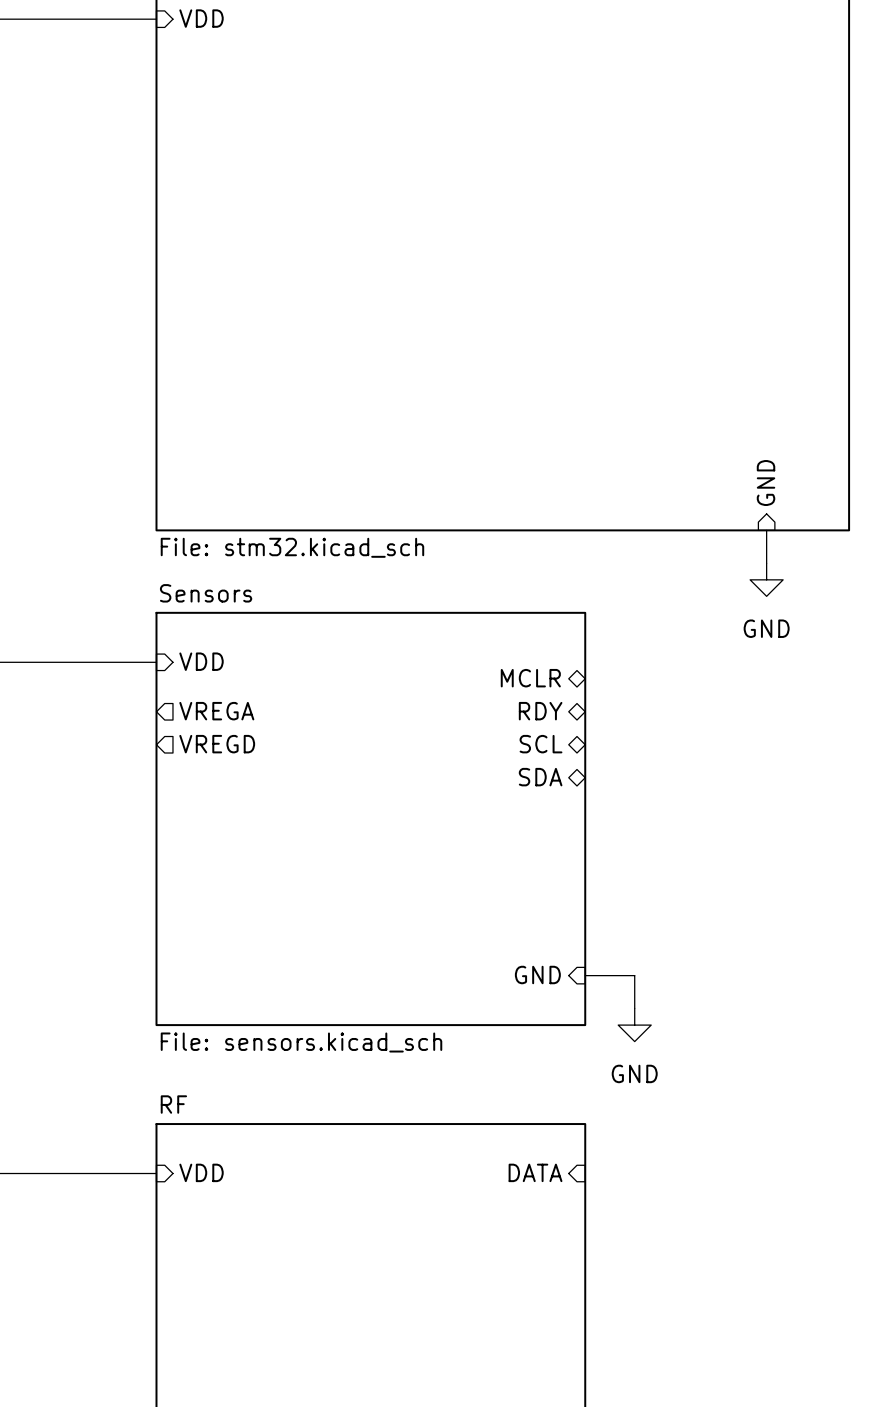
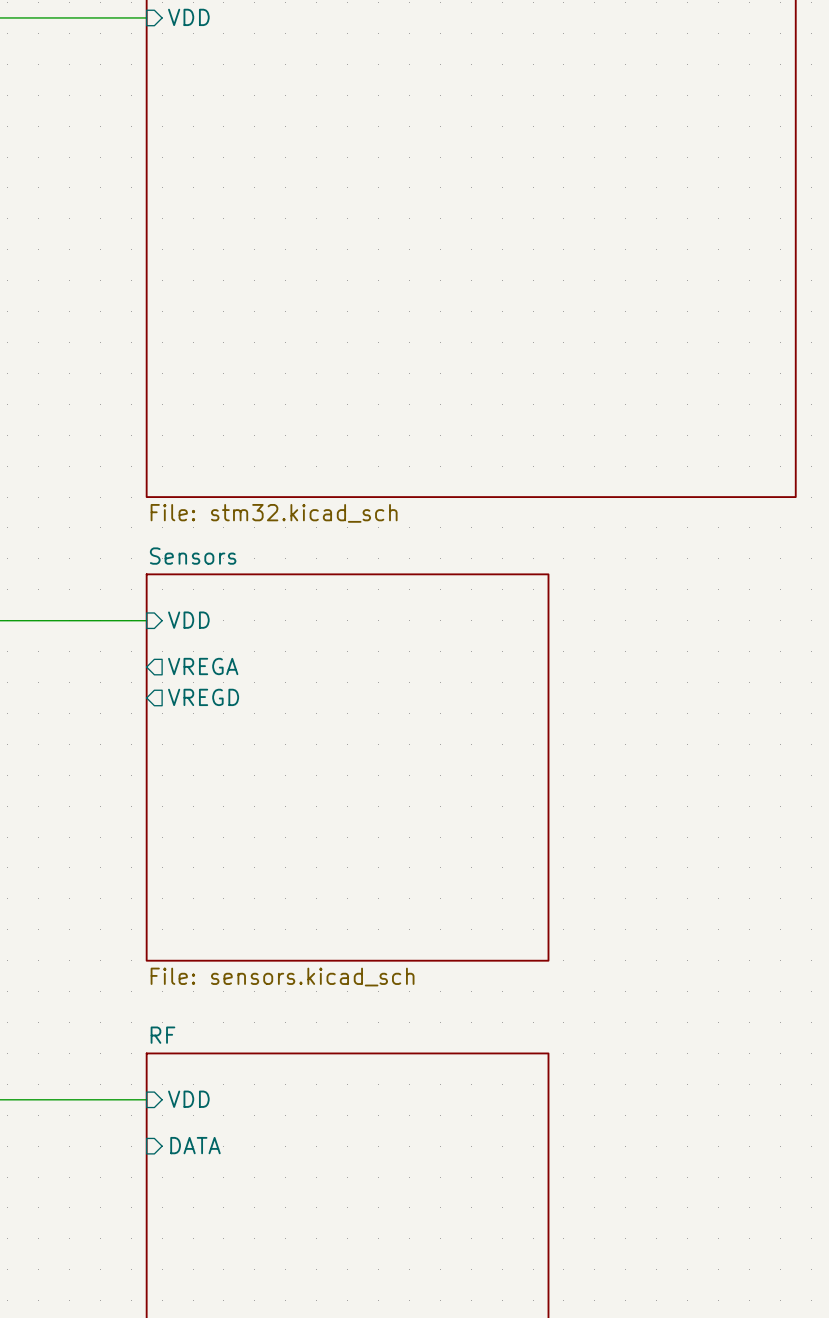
sheet pin: GND (766, 483) -> none
wire: (766, 530) (766, 563) -> none
power symbol: GND (766, 579) -> none
sheet pin: MCLR (530, 678) -> none
sheet pin: RDY (540, 711) -> none
sheet pin: SCL (541, 744) -> none
sheet pin: SDA (540, 777) -> none
sheet pin: GND (537, 975) -> none
wire: (585, 975) (634, 975) (634, 1008) -> none
power symbol: GND (634, 1025) -> none
sheet pin: DATA (535, 1172) -> none
sheet pin: none -> DATA (195, 1145)

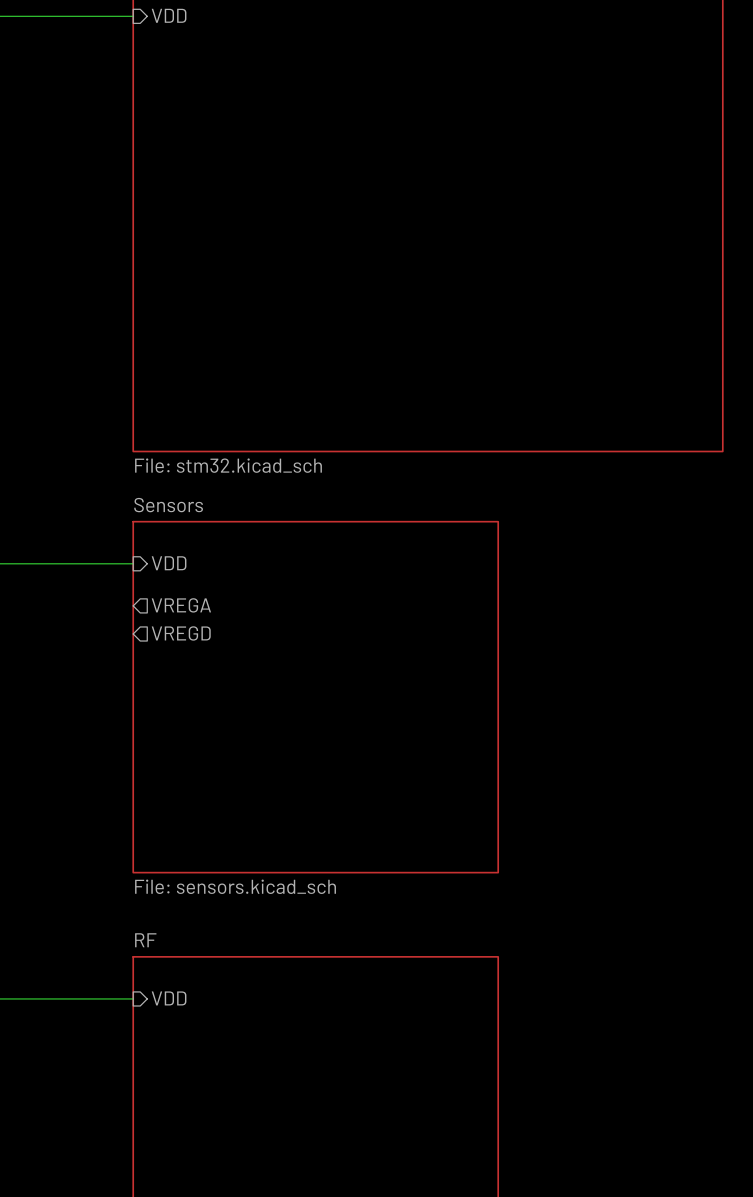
sheet pin: DATA (195, 1145) -> none

